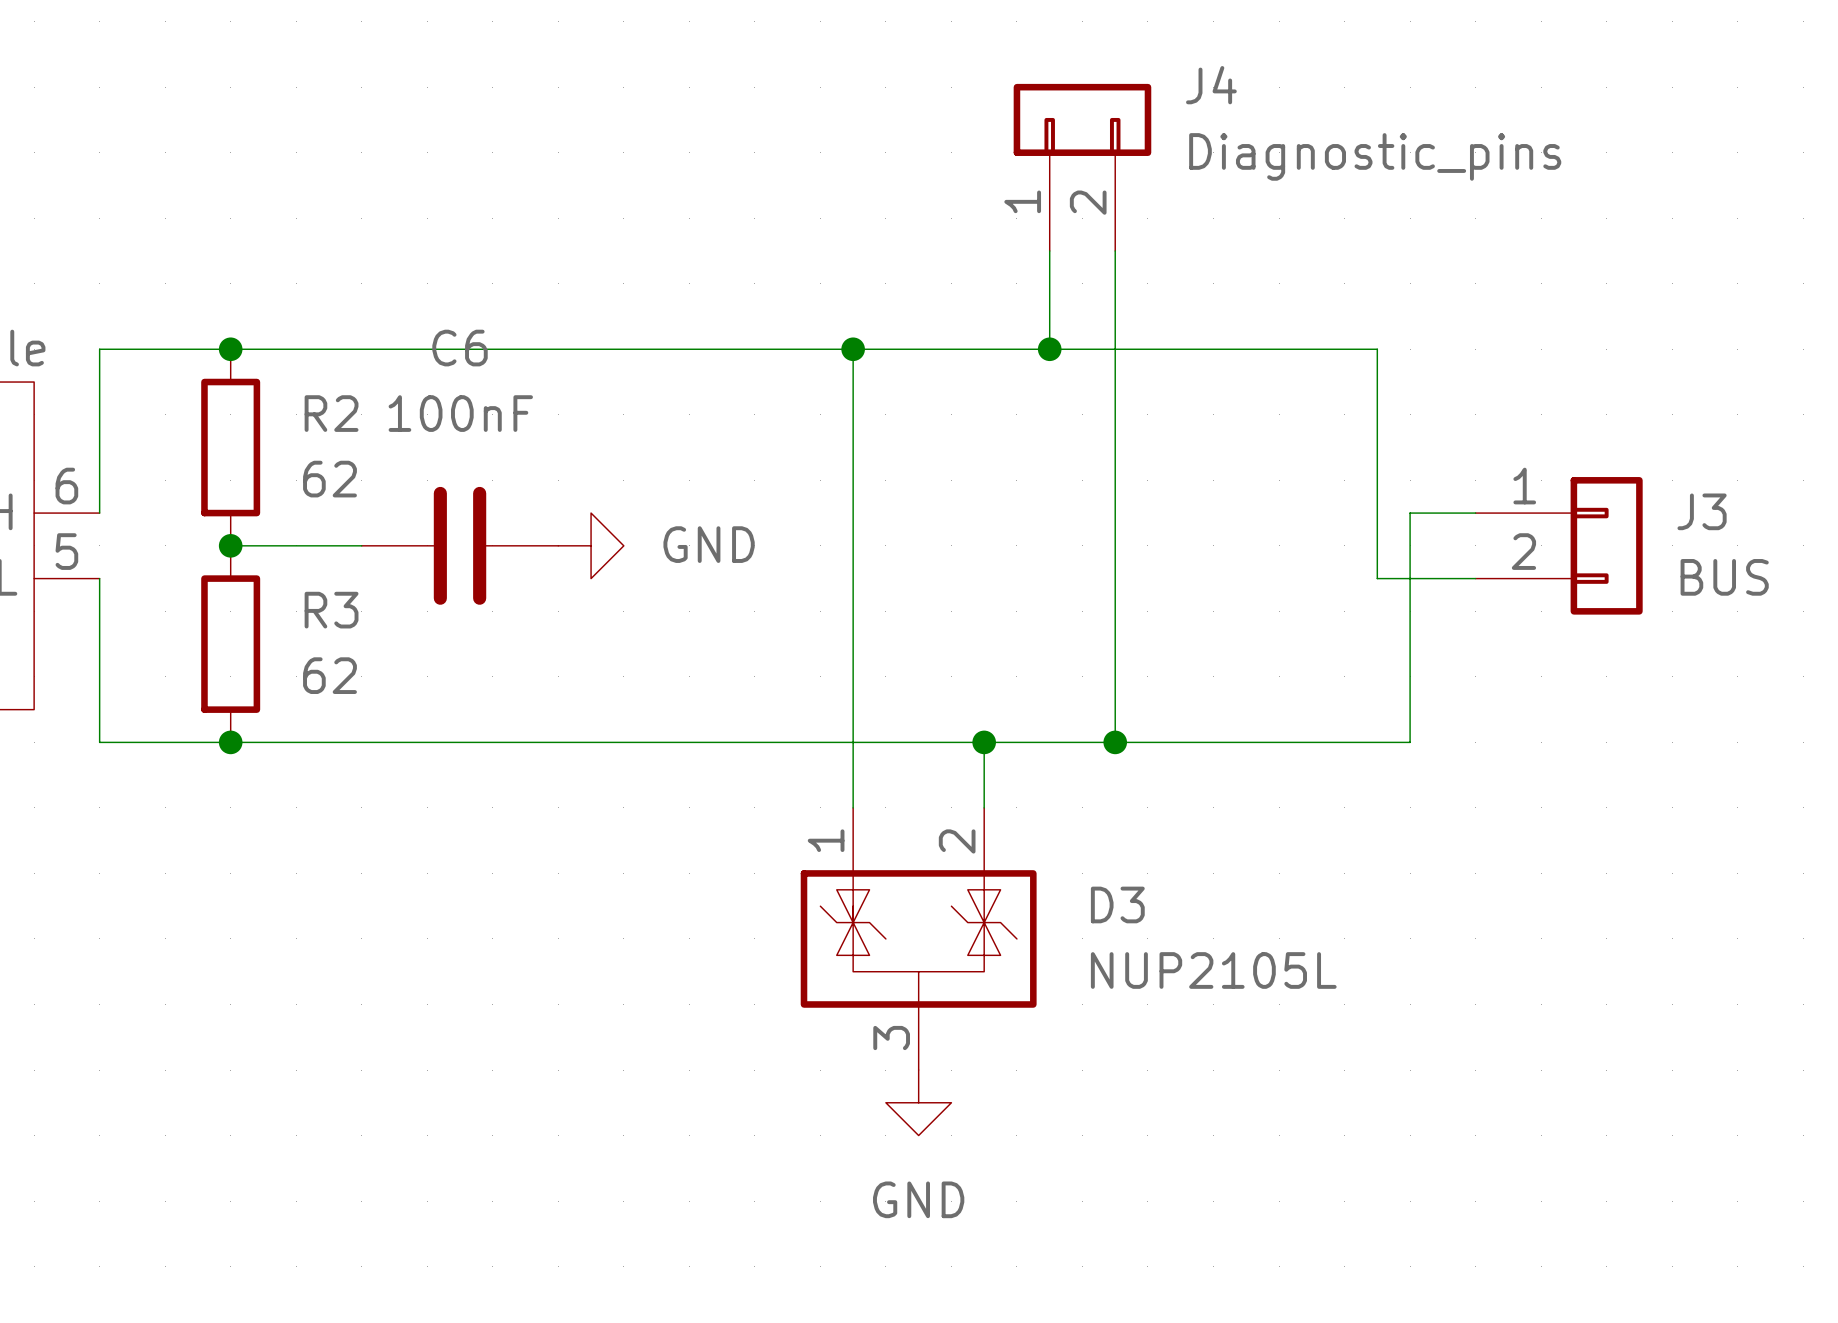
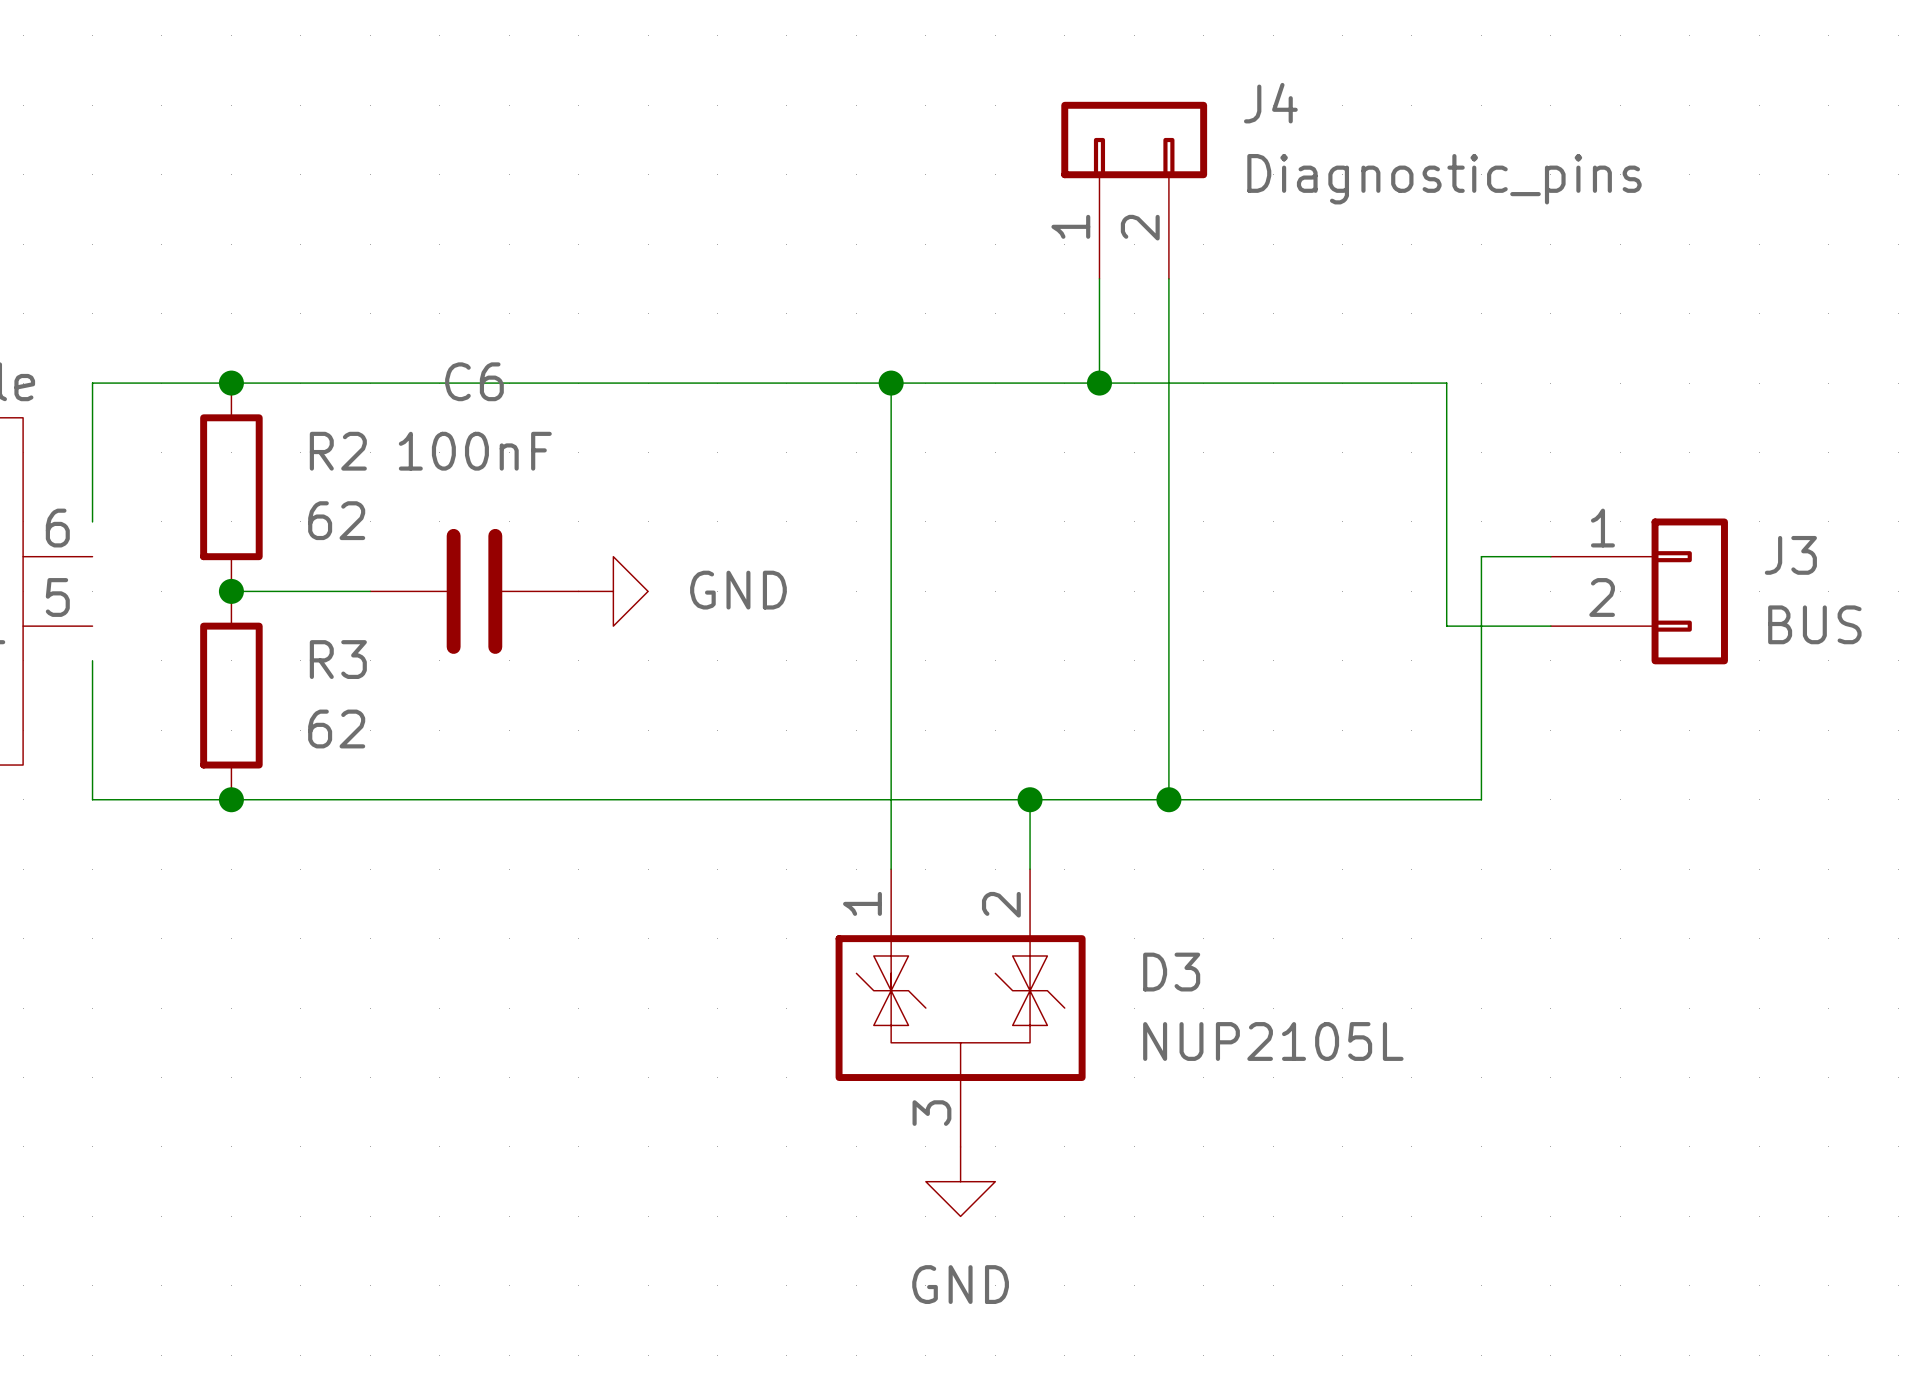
wire: (99, 480) (99, 513) -> none
wire: (99, 578) (99, 611) -> none

